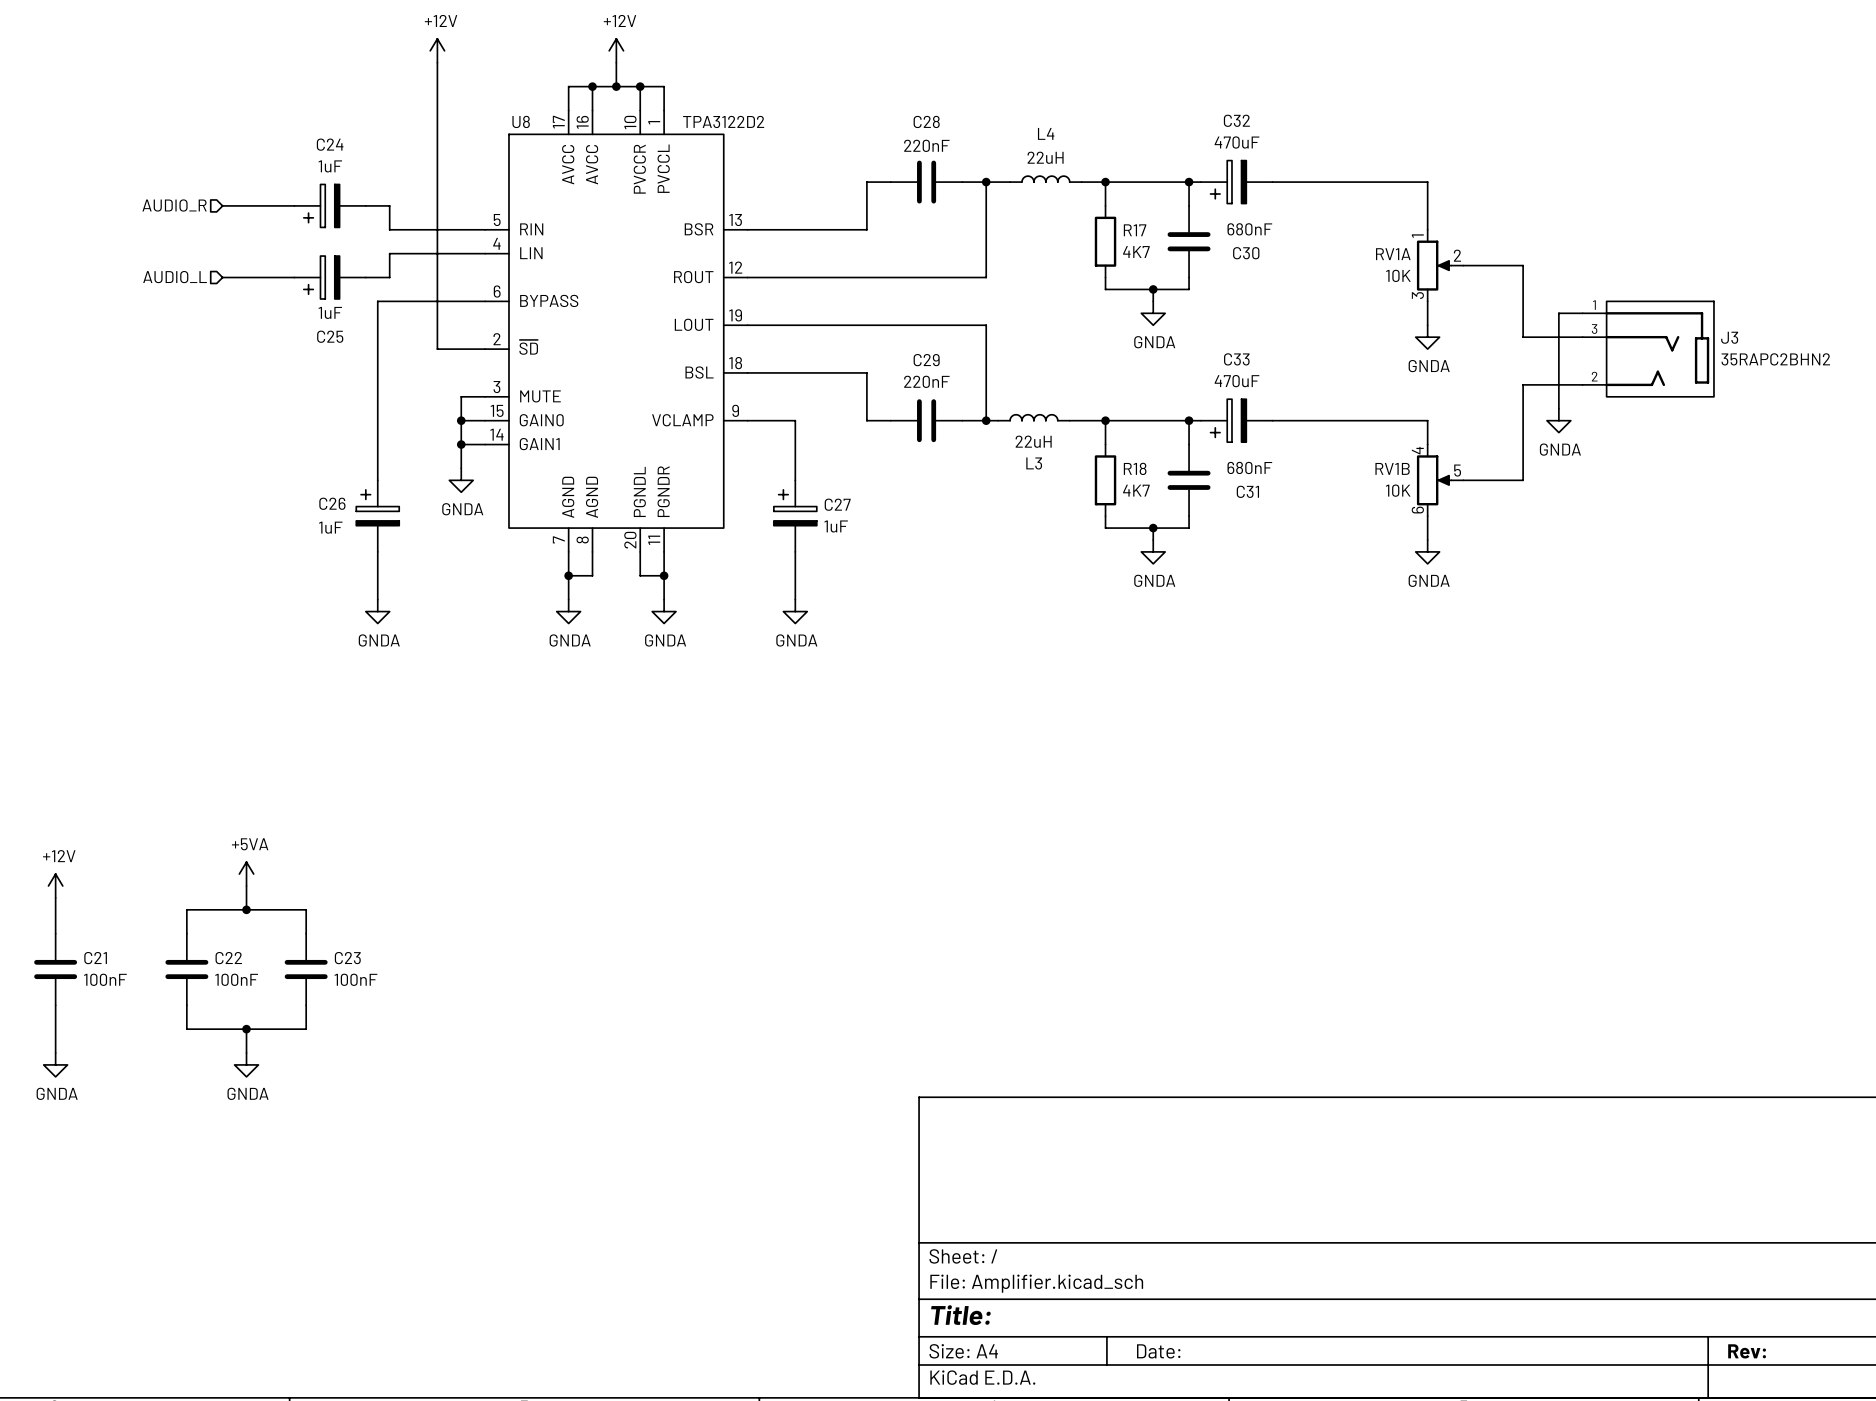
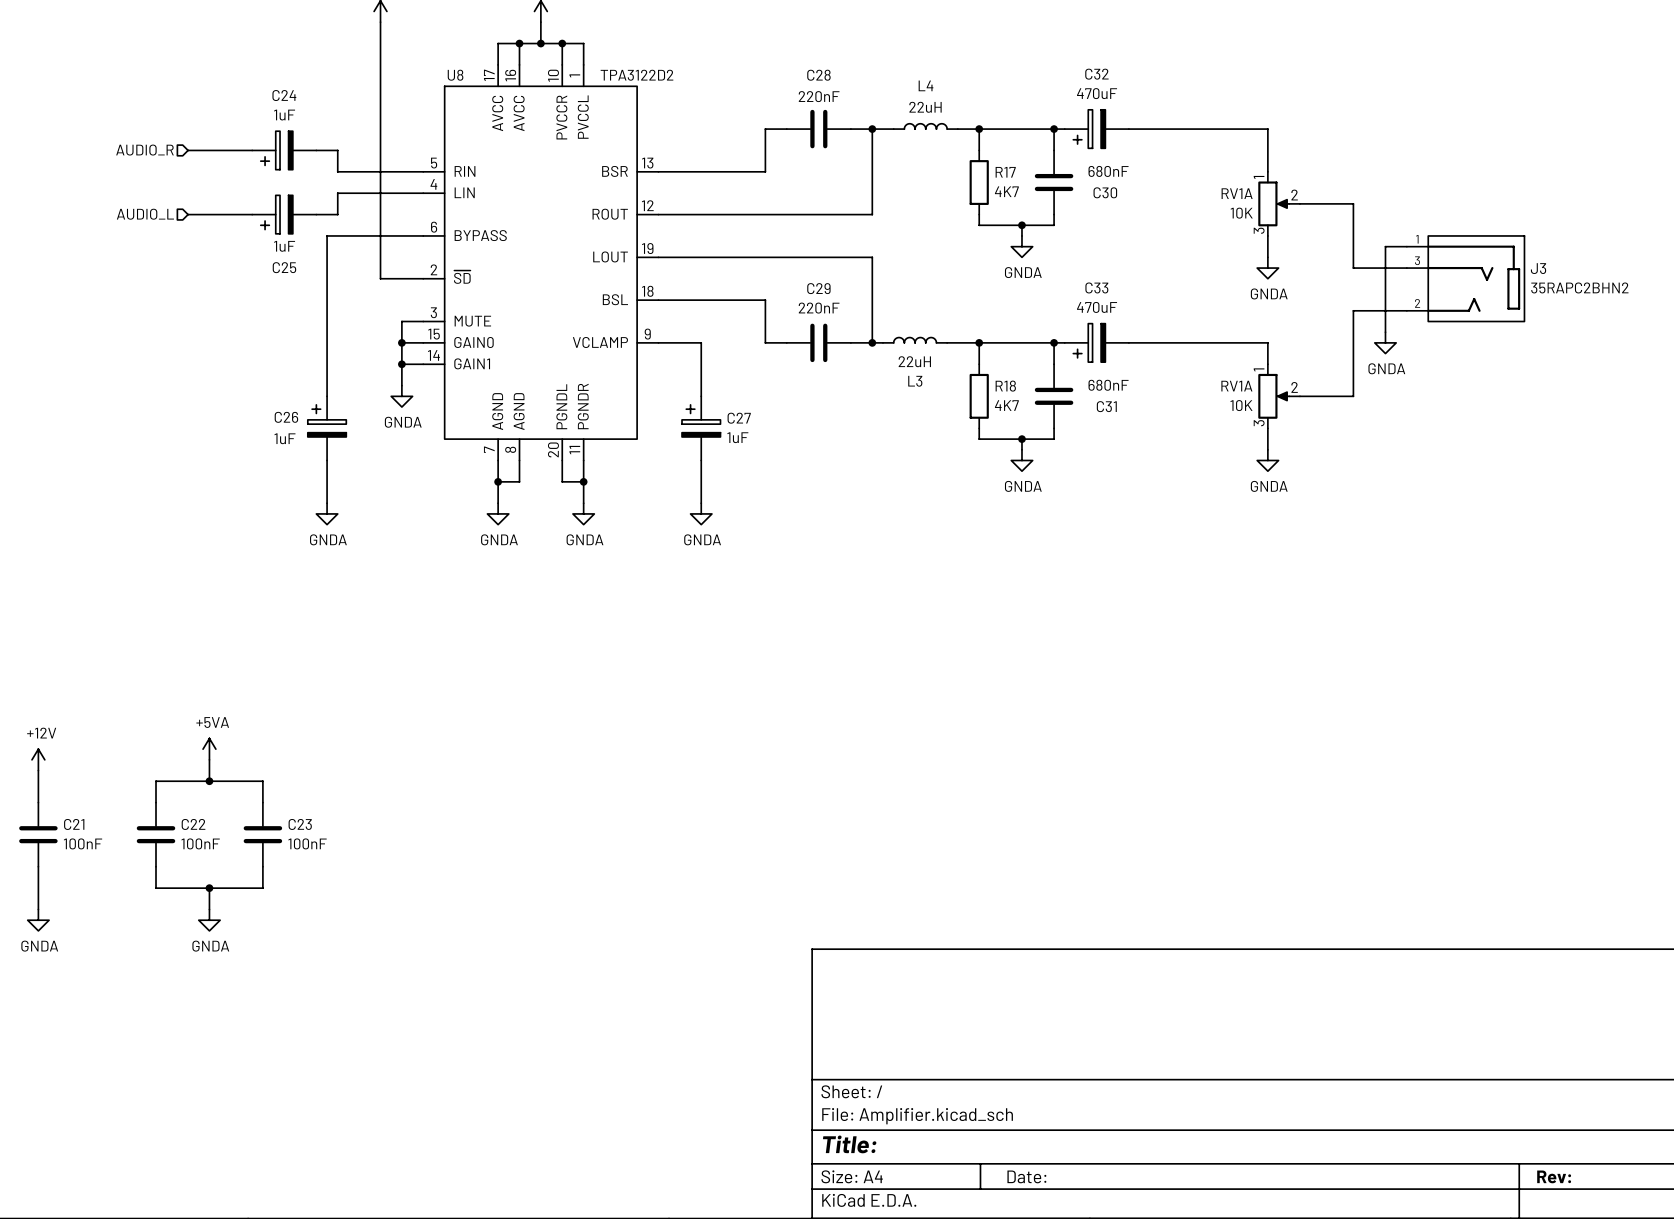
RV1B pin number: 4 (1417, 450) -> 1 (1259, 369)
RV1B name: RV1B (1392, 468) -> RV1A (1236, 386)
RV1B pin number: 5 (1457, 470) -> 2 (1294, 387)
RV1B pin number: 6 (1417, 510) -> 3 (1259, 423)

